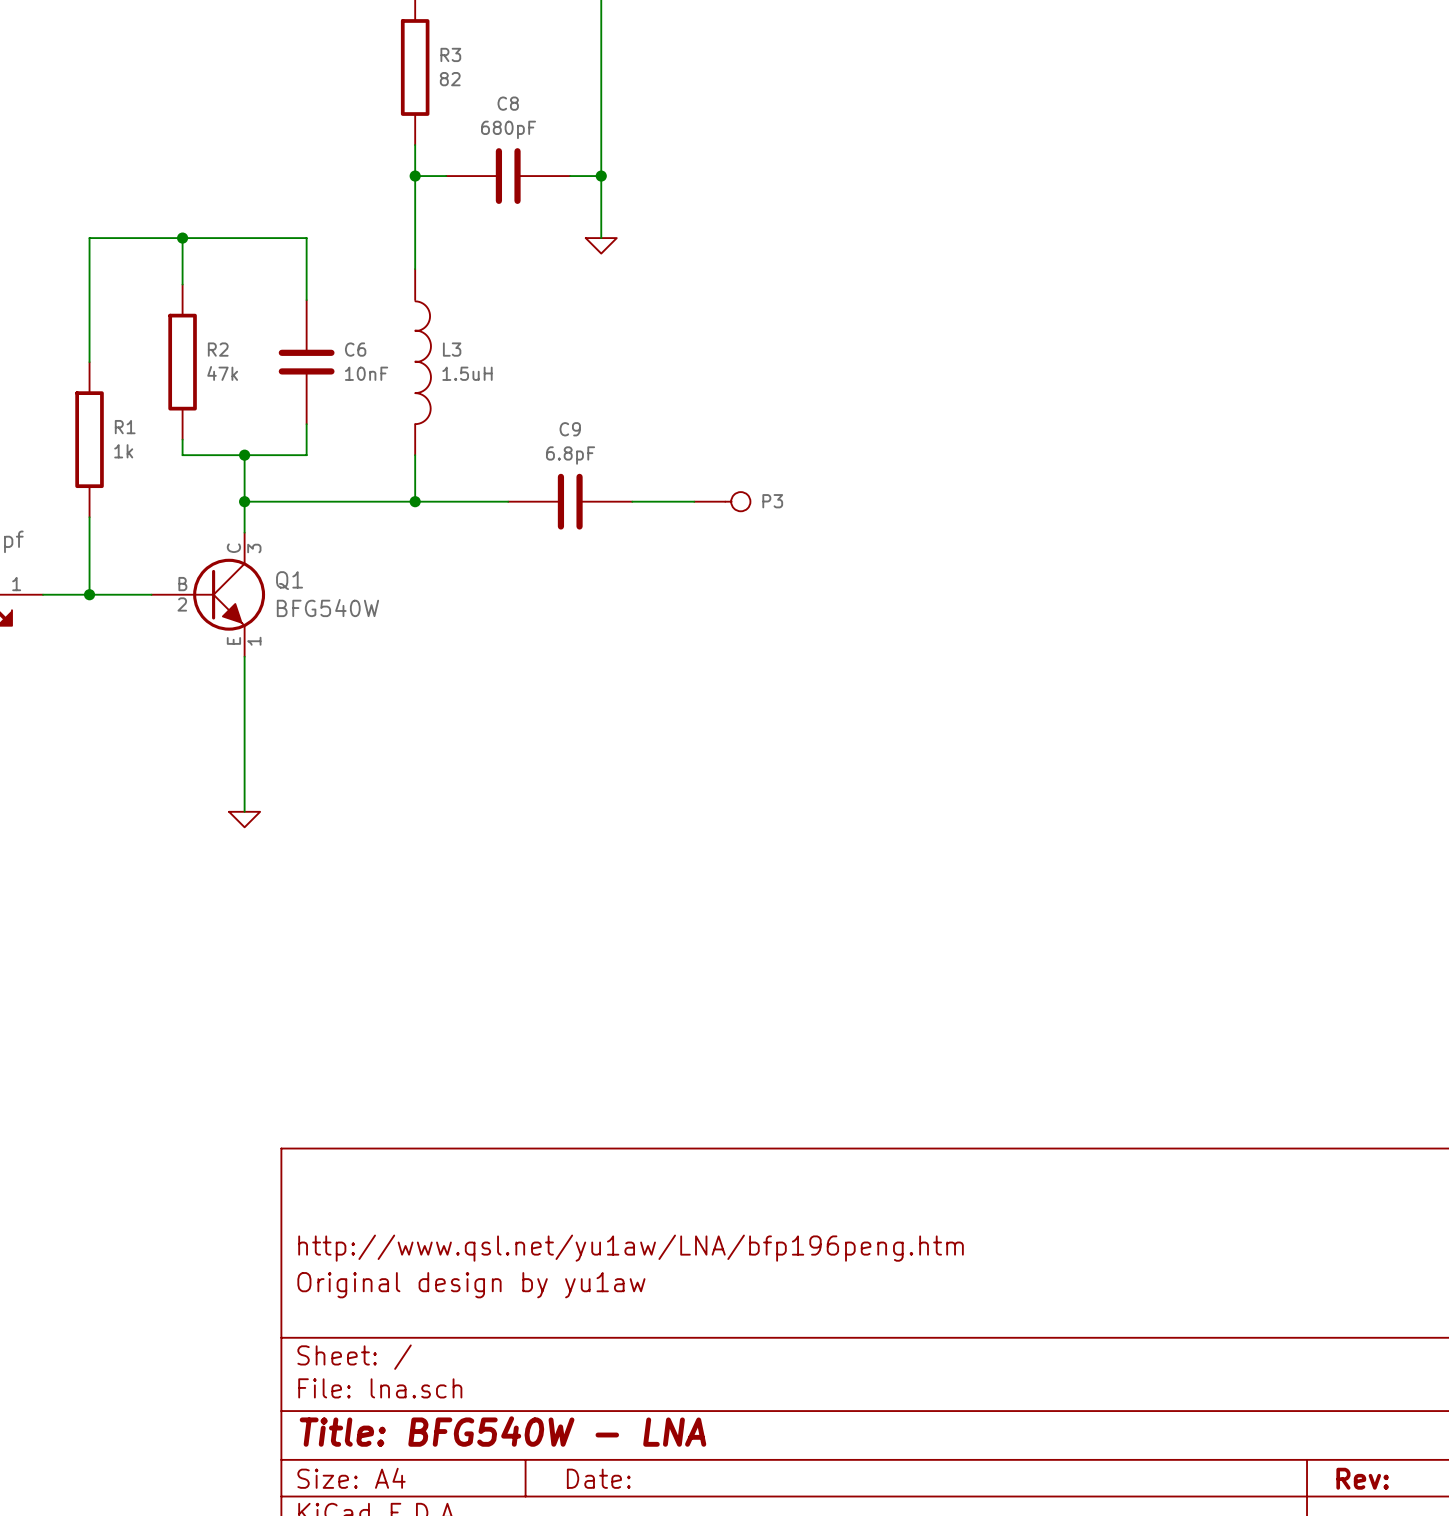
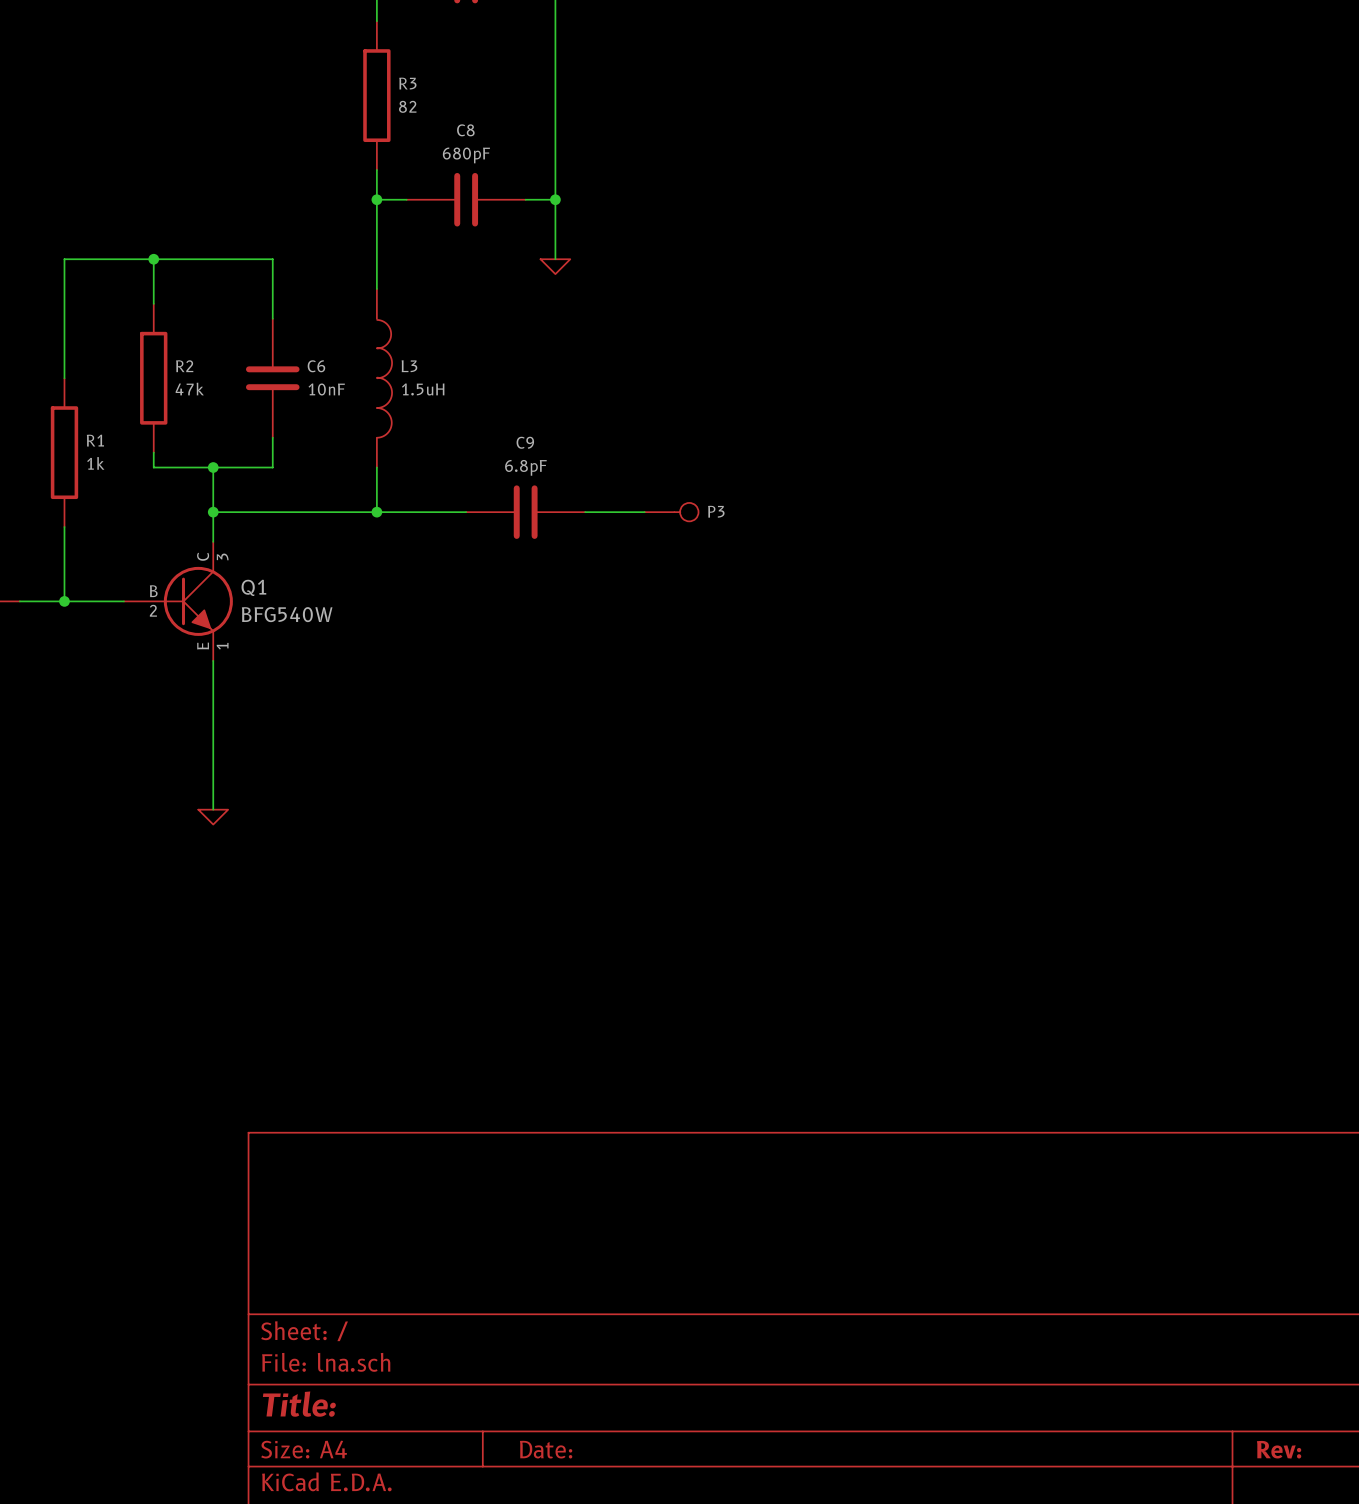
title block: http://www.qsl.net/yu1aw/LNA/bfp196peng.htm (631, 1248) -> none
title block: Original design by yu1aw (471, 1285) -> none
title block: Title: BFG540W - LNA (502, 1431) -> Title: (299, 1404)

